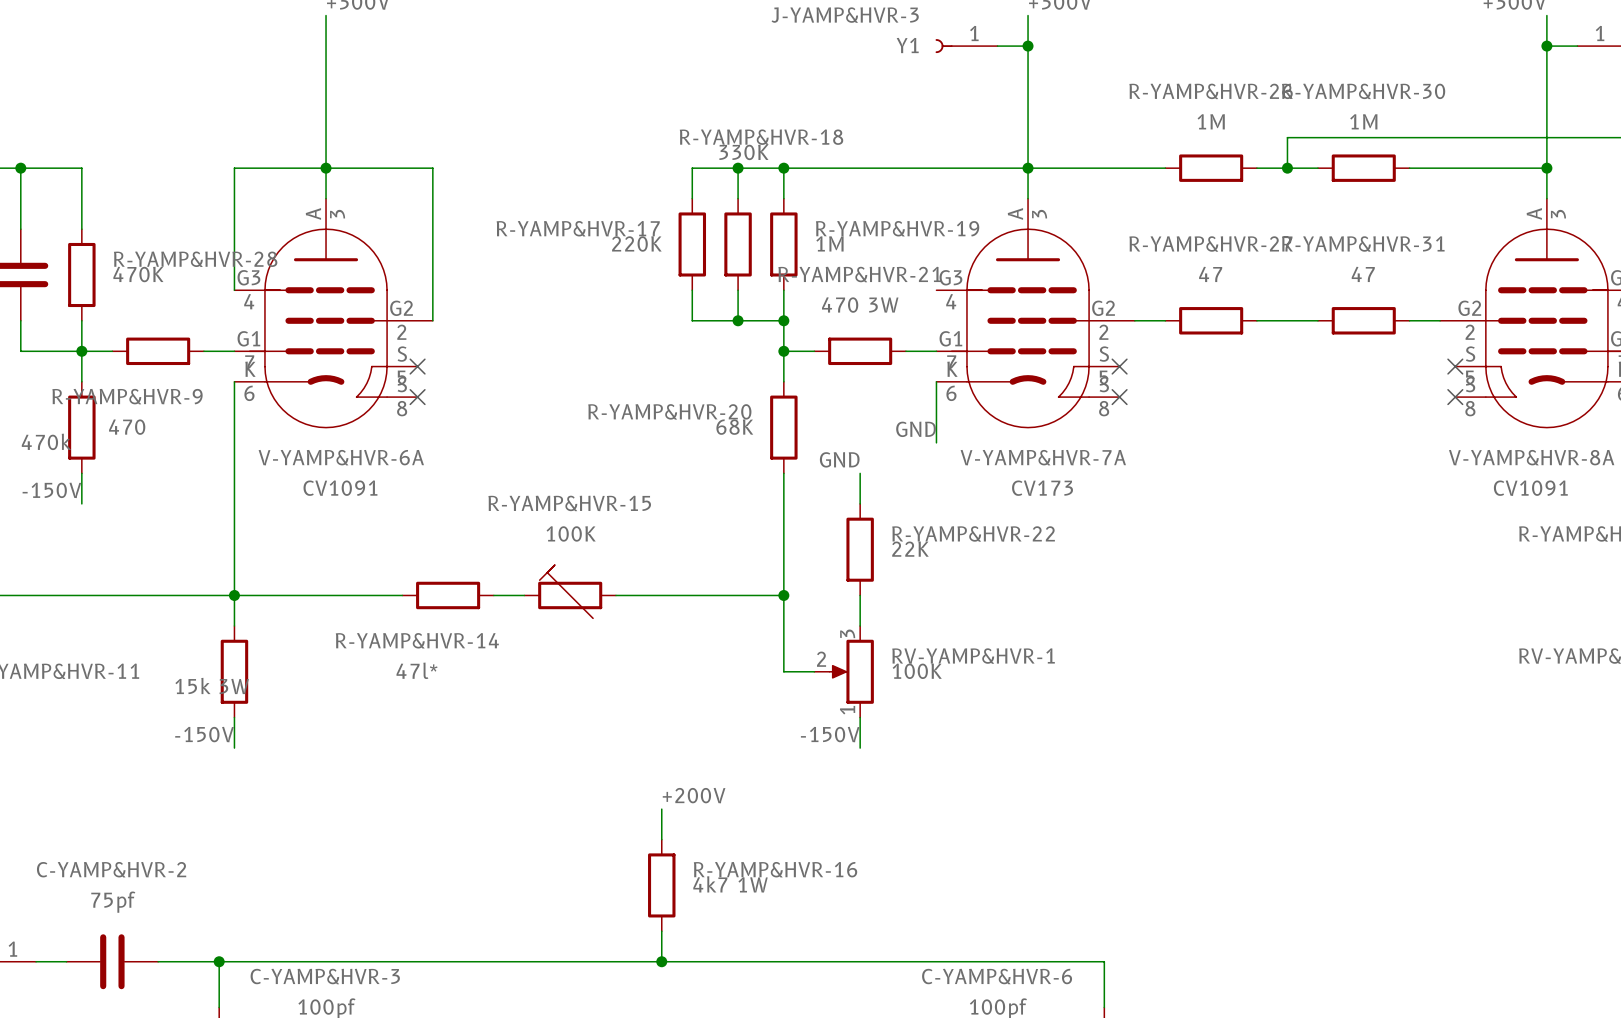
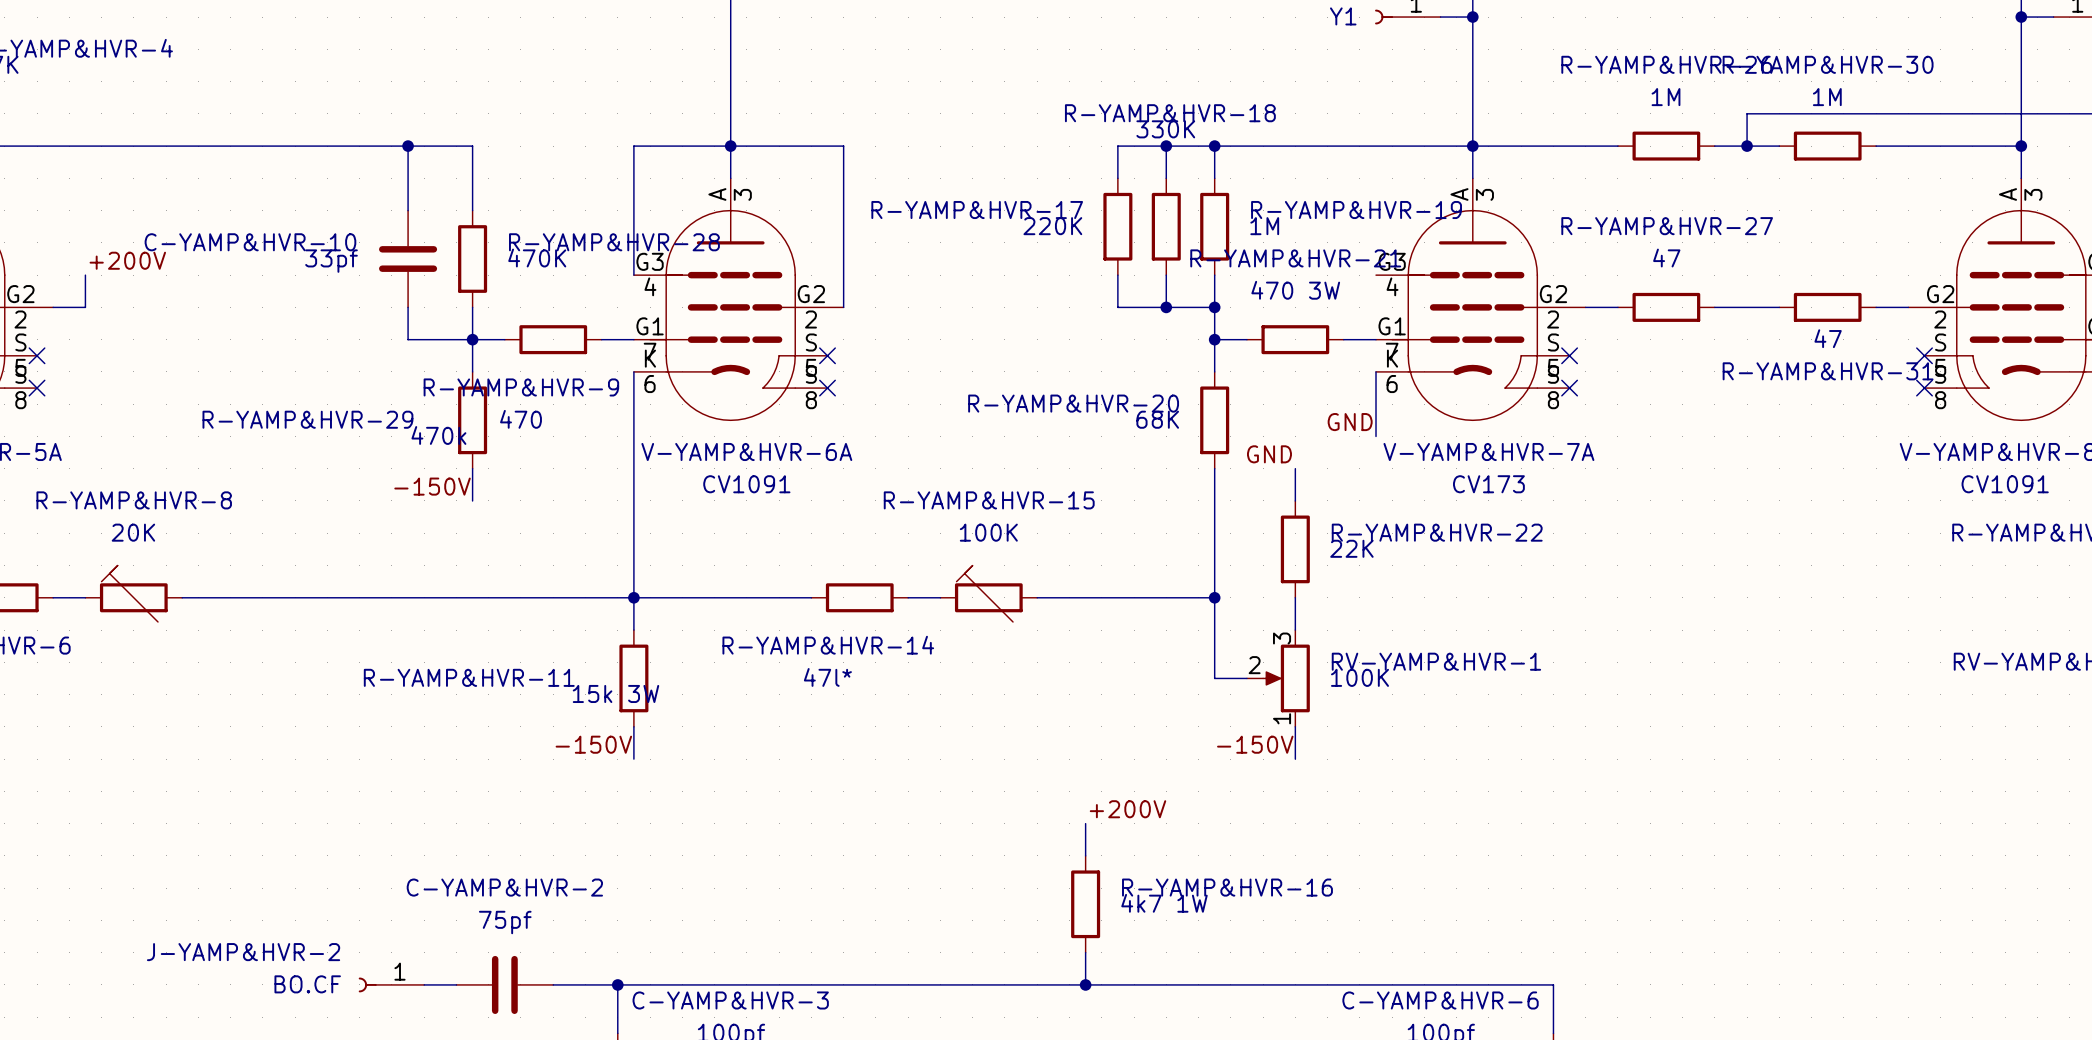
R-YAMP&HVR-31 name position: R-YAMP&HVR-31 (1363, 244) -> R-YAMP&HVR-31 (1828, 371)
R-YAMP&HVR-31 value position: 47 (1363, 274) -> 47 (1828, 338)

